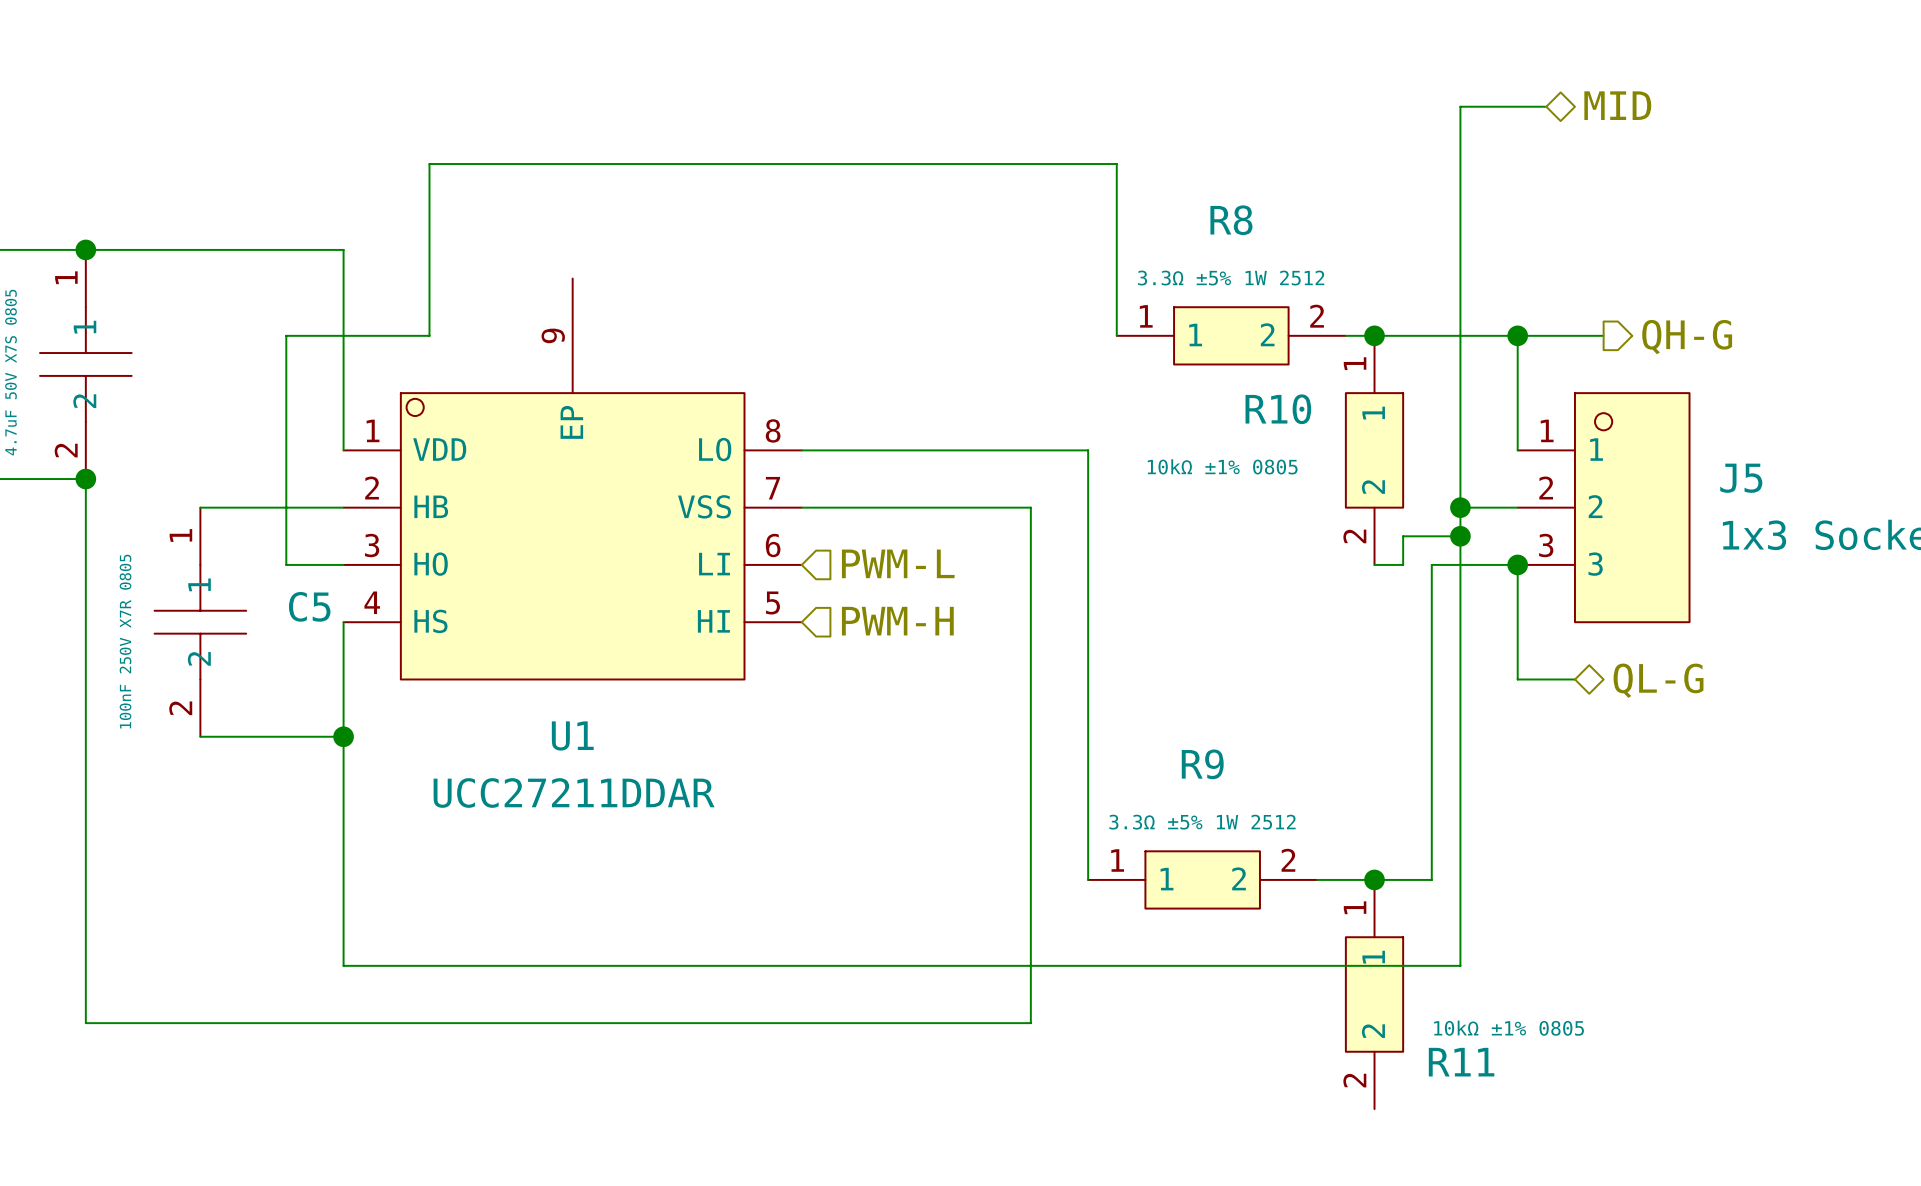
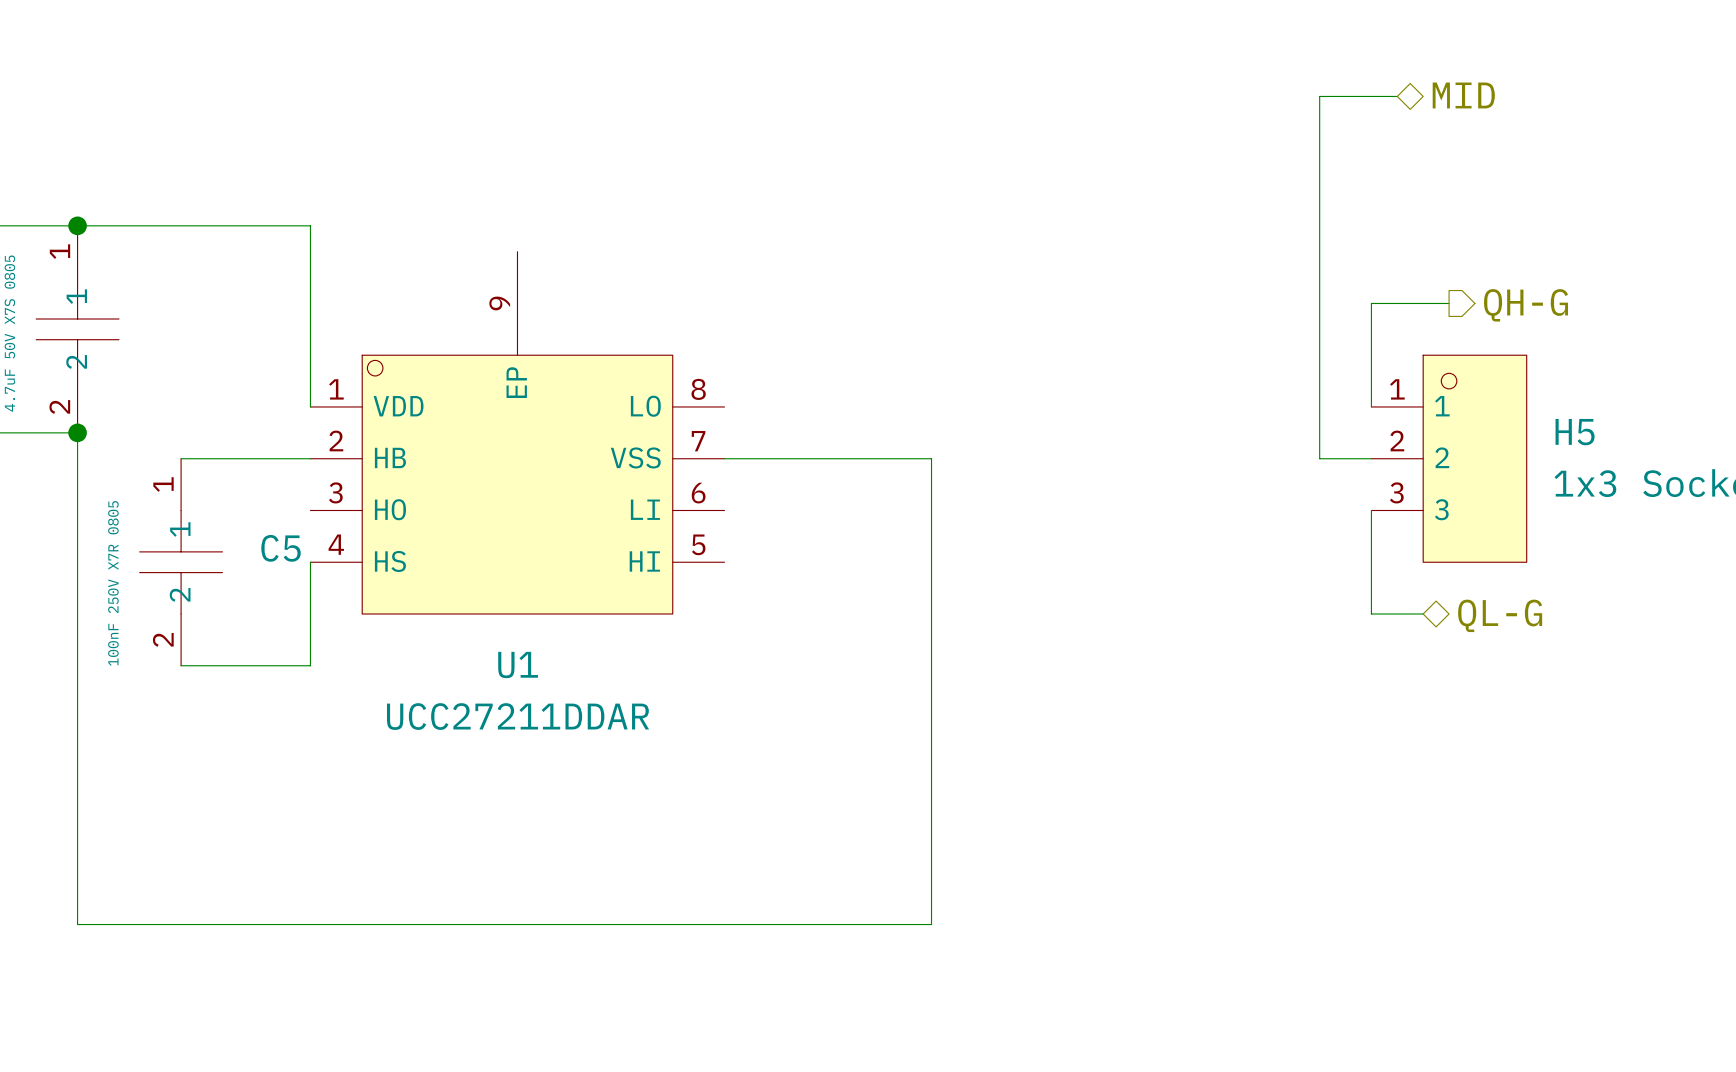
wire: (1116, 335) (1116, 164) (429, 164) (429, 335) (286, 335) (286, 564) (343, 564) -> none
R8: 3.3Ω ±5% 1W 2512 (1231, 335) -> none
wire: (1345, 335) (1517, 335) -> none
junction: (1374, 335) -> none
junction: (1517, 335) -> none
wire: (801, 450) (1088, 450) (1088, 879) -> none
R10: 10kΩ ±1% 0805 (1374, 450) -> none
J5 name: J5 (1741, 478) -> H5 (1575, 432)
wire: (1460, 507) (1460, 965) (343, 965) (343, 736) -> none
junction: (1460, 507) -> none
wire: (1460, 536) (1403, 536) (1403, 564) (1374, 564) -> none
junction: (1460, 536) -> none
hierarchical label: PWM-L (898, 563) -> none
wire: (1517, 564) (1431, 564) (1431, 879) (1317, 879) -> none
junction: (1517, 564) -> none
hierarchical label: PWM-H (897, 621) -> none
junction: (343, 736) -> none
R9: 3.3Ω ±5% 1W 2512 (1202, 879) -> none
junction: (1374, 879) -> none
R11: 10kΩ ±1% 0805 (1374, 994) -> none

